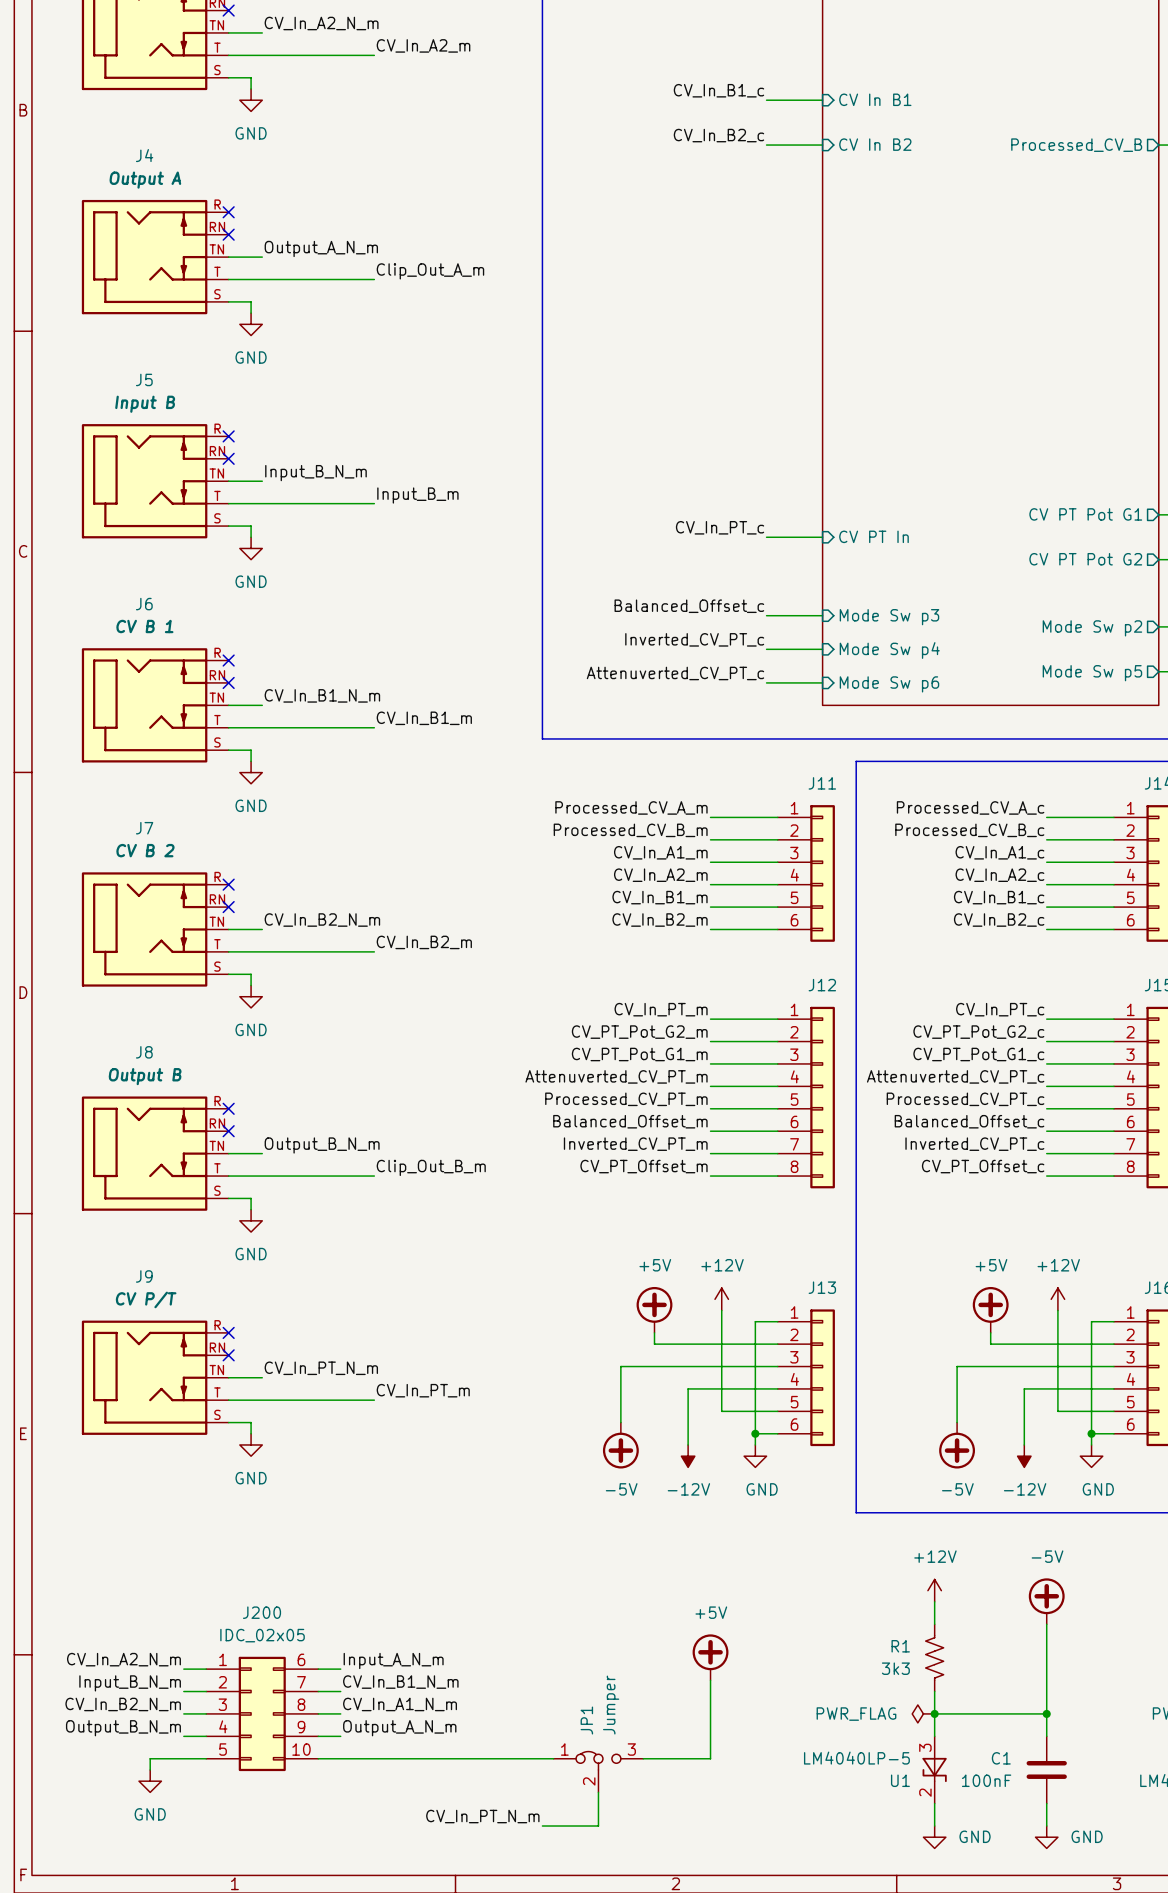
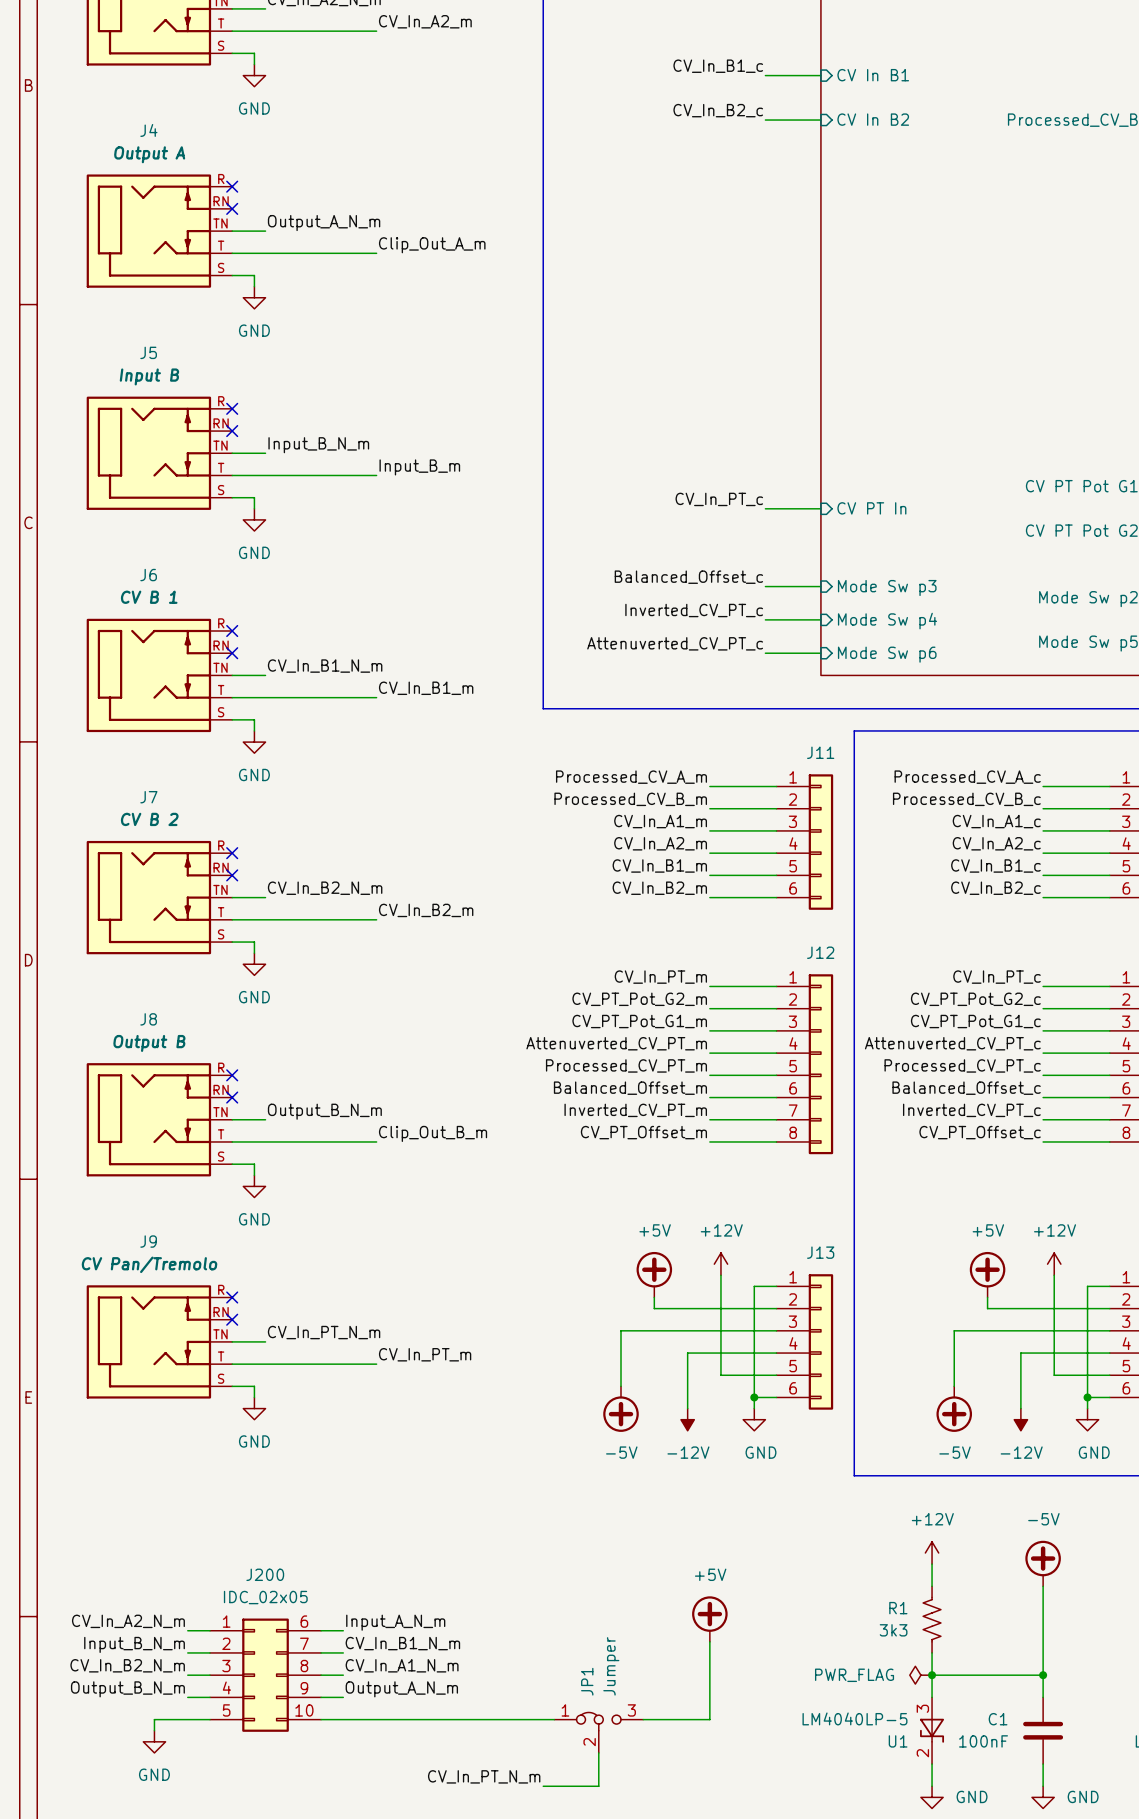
J9 text: CV P/T (146, 1299) -> CV Pan/Tremolo (149, 1264)

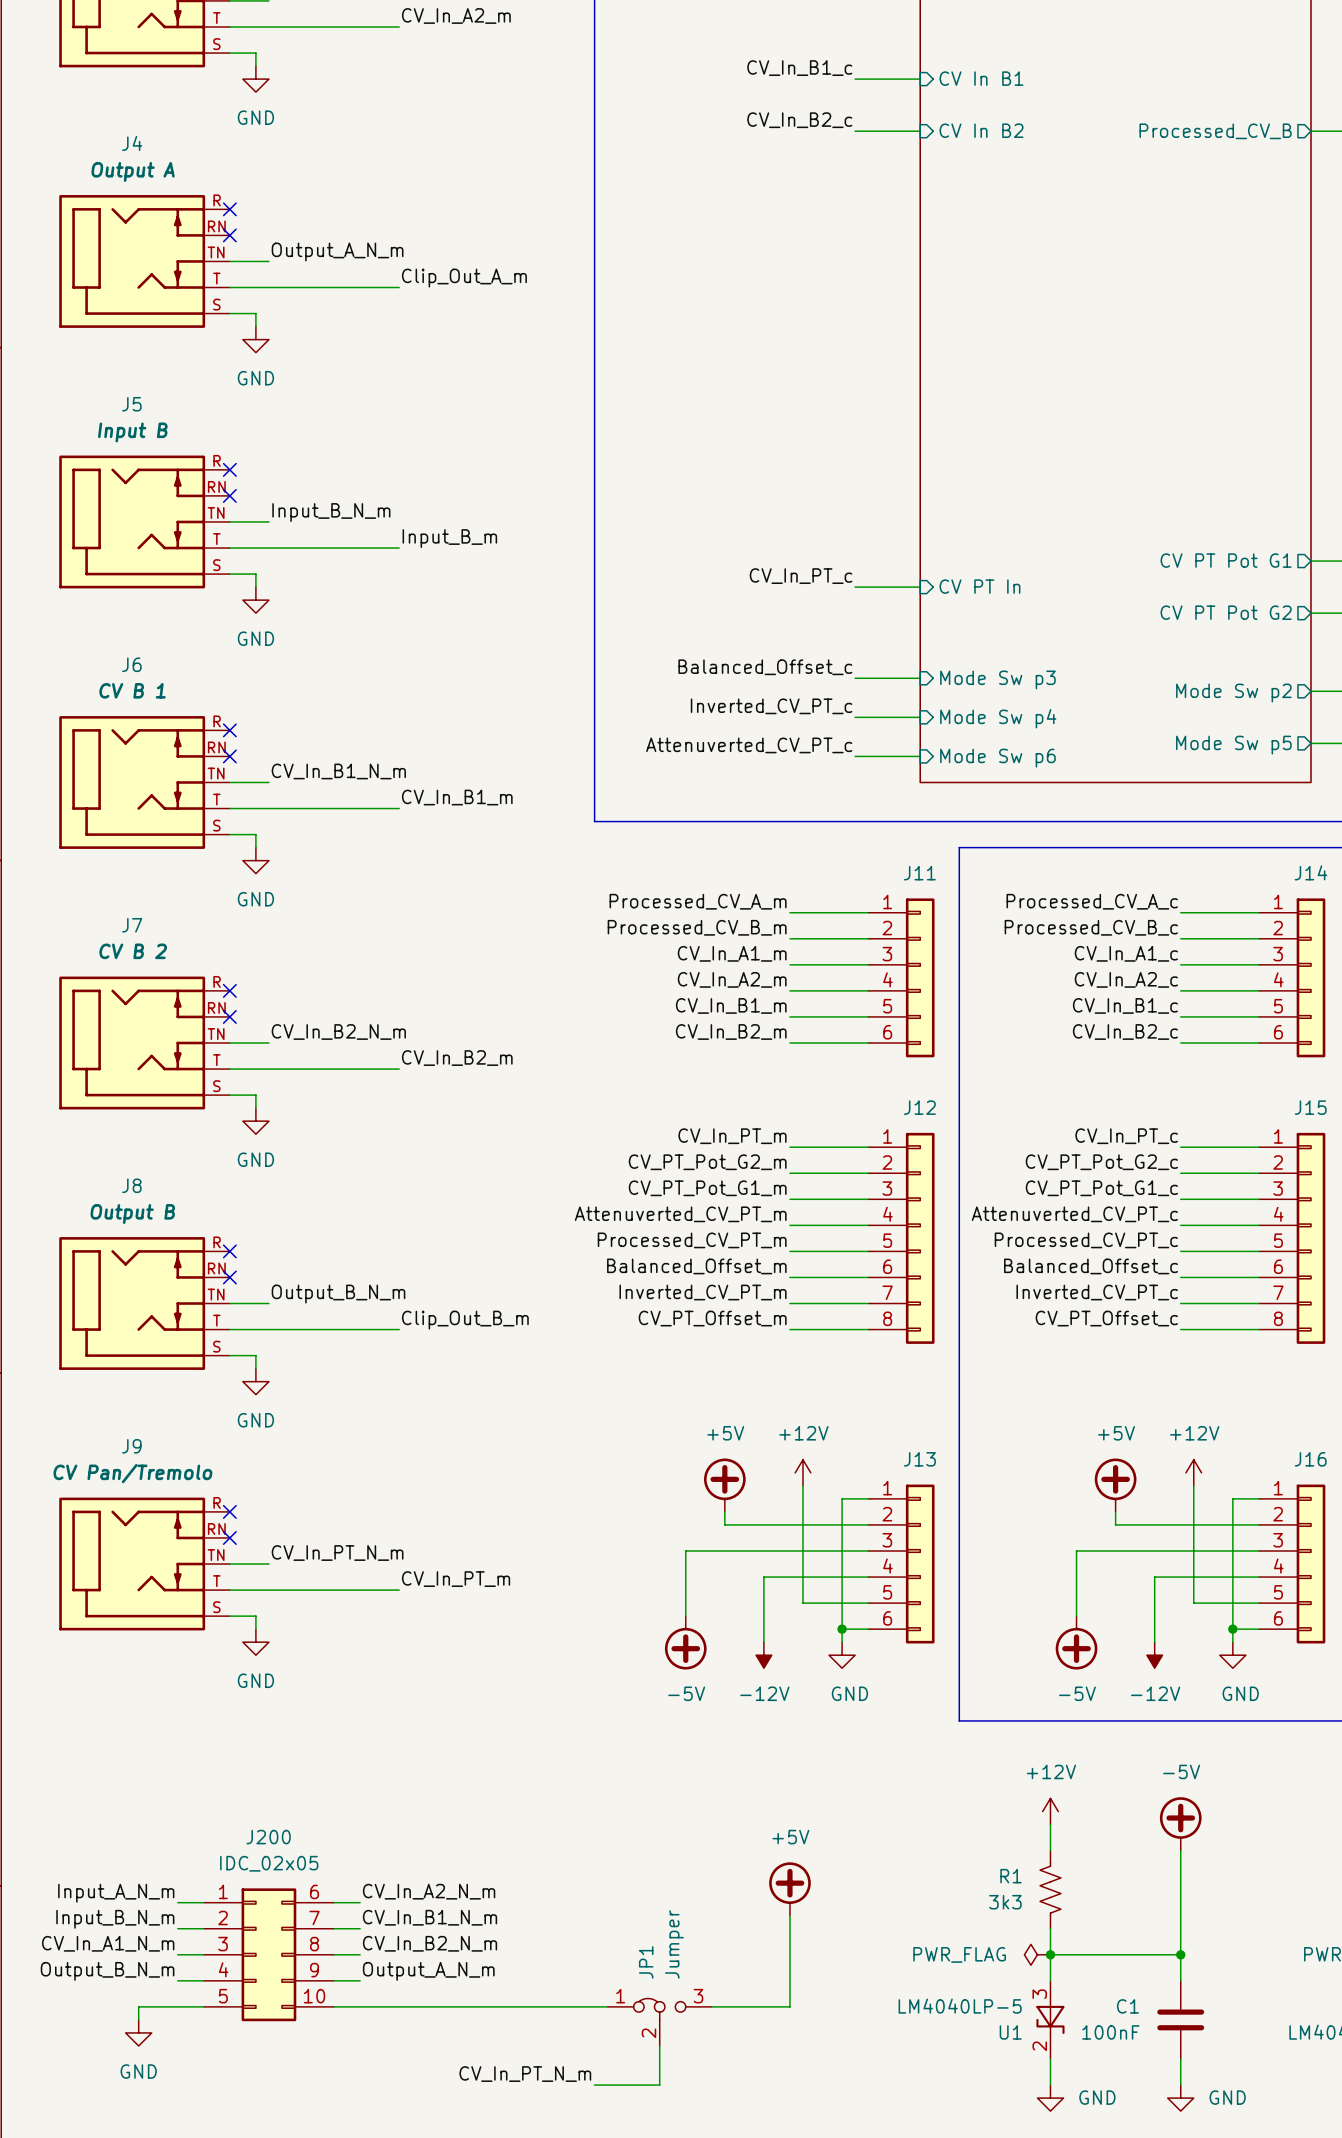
label: CV_In_A2_N_m (128, 1621) -> Input_A_N_m (116, 1893)
label: Input_A_N_m (395, 1622) -> CV_In_A2_N_m (429, 1891)
label: CV_In_B2_N_m (127, 1665) -> CV_In_A1_N_m (108, 1943)
label: CV_In_A1_N_m (402, 1665) -> CV_In_B2_N_m (430, 1943)

